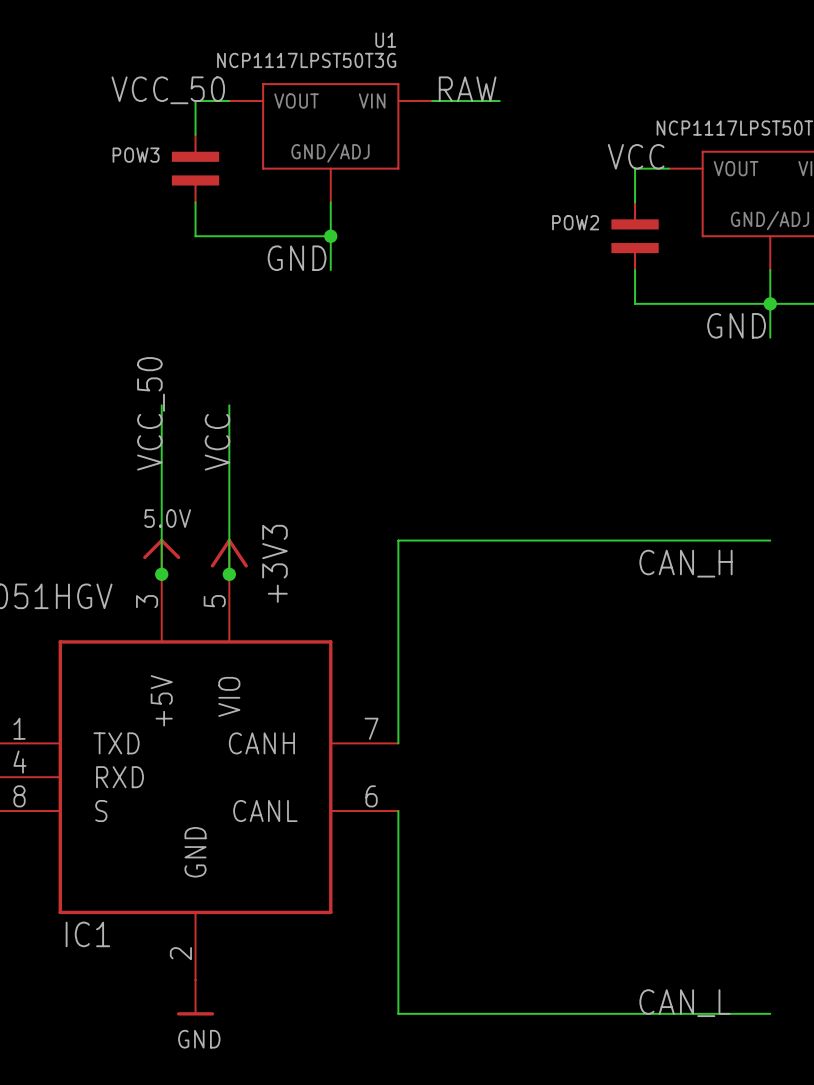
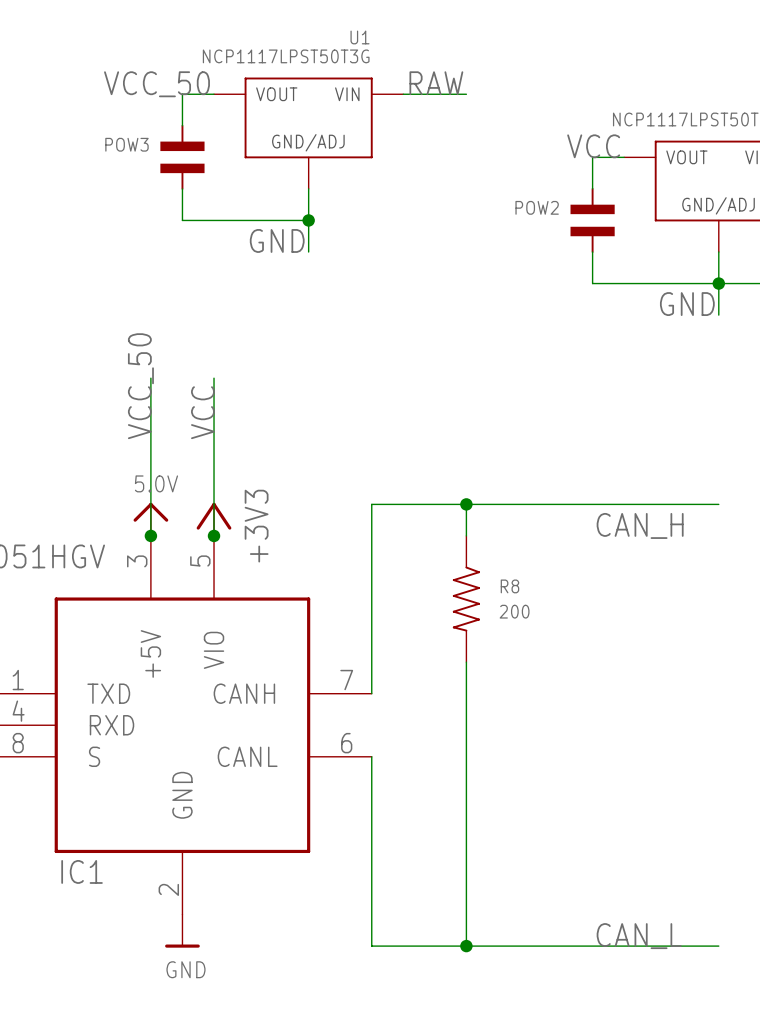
wire: none -> (466, 504) (466, 535)
junction: none -> (466, 504)
R8: none -> 200 (466, 599)
wire: none -> (466, 662) (466, 946)
junction: none -> (466, 946)

